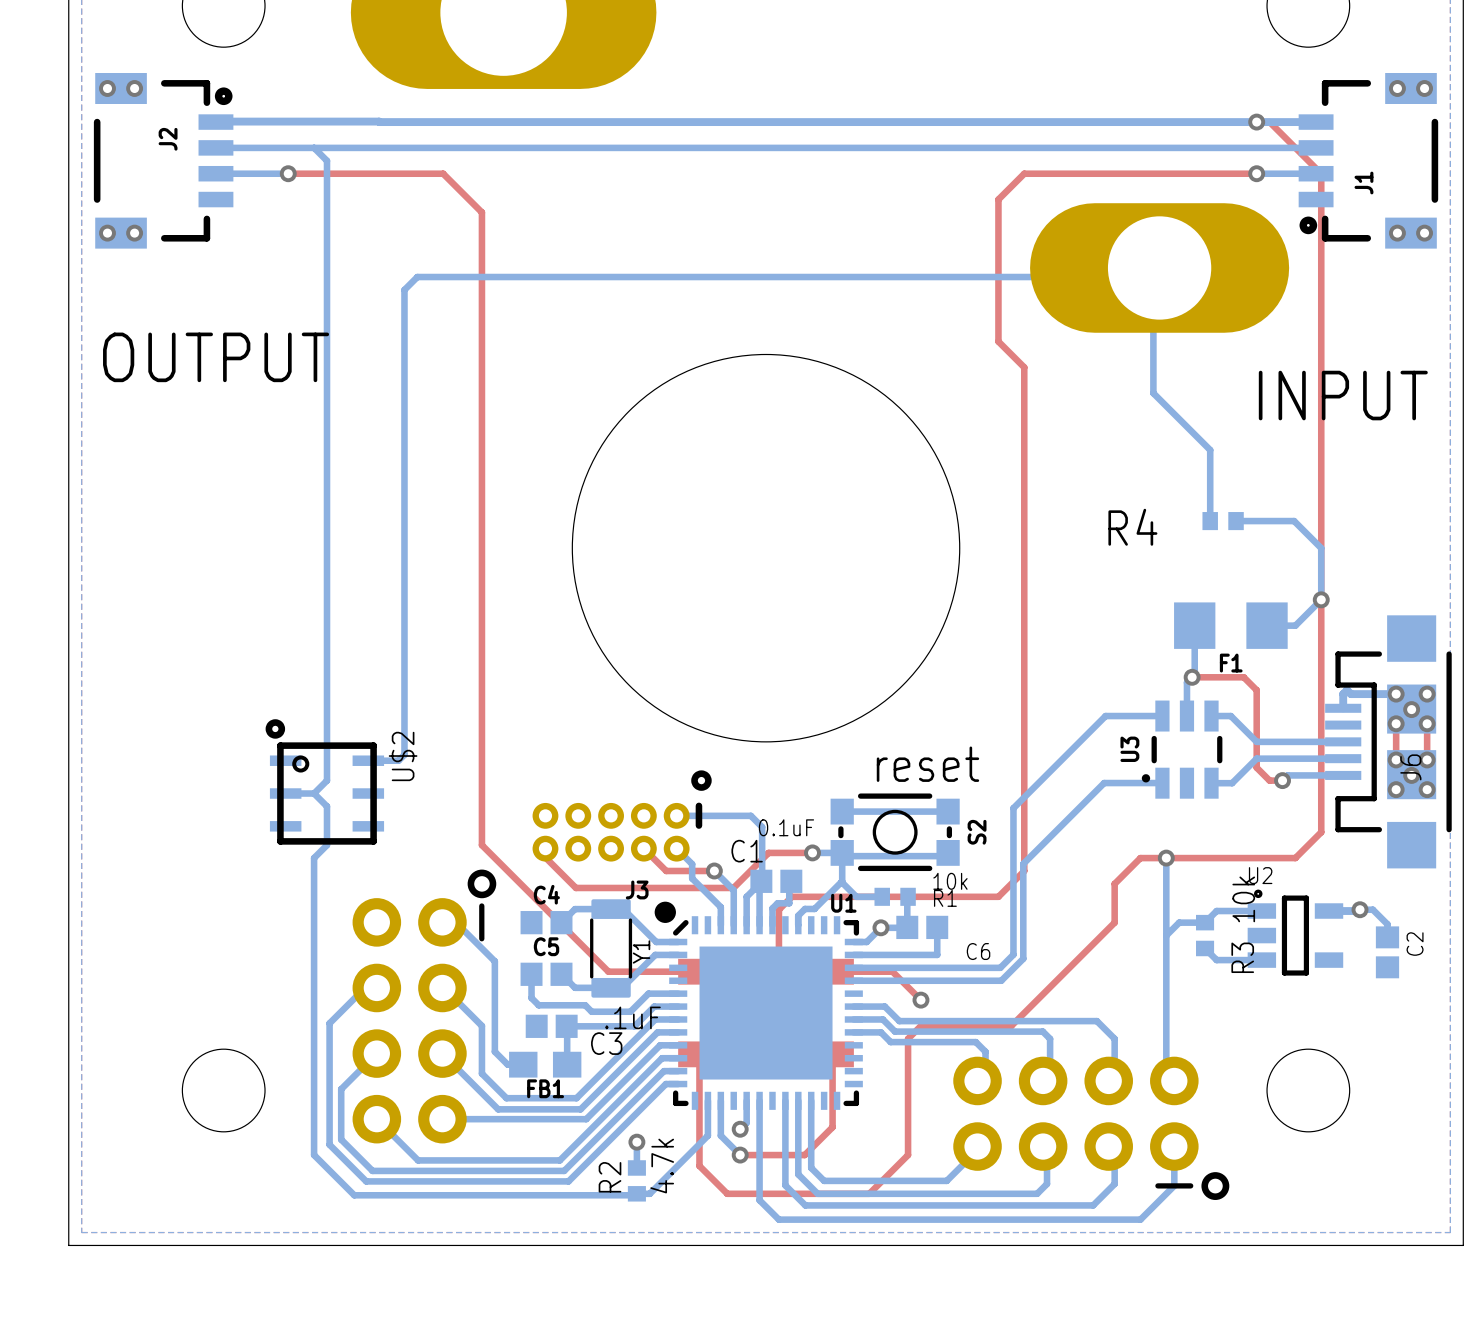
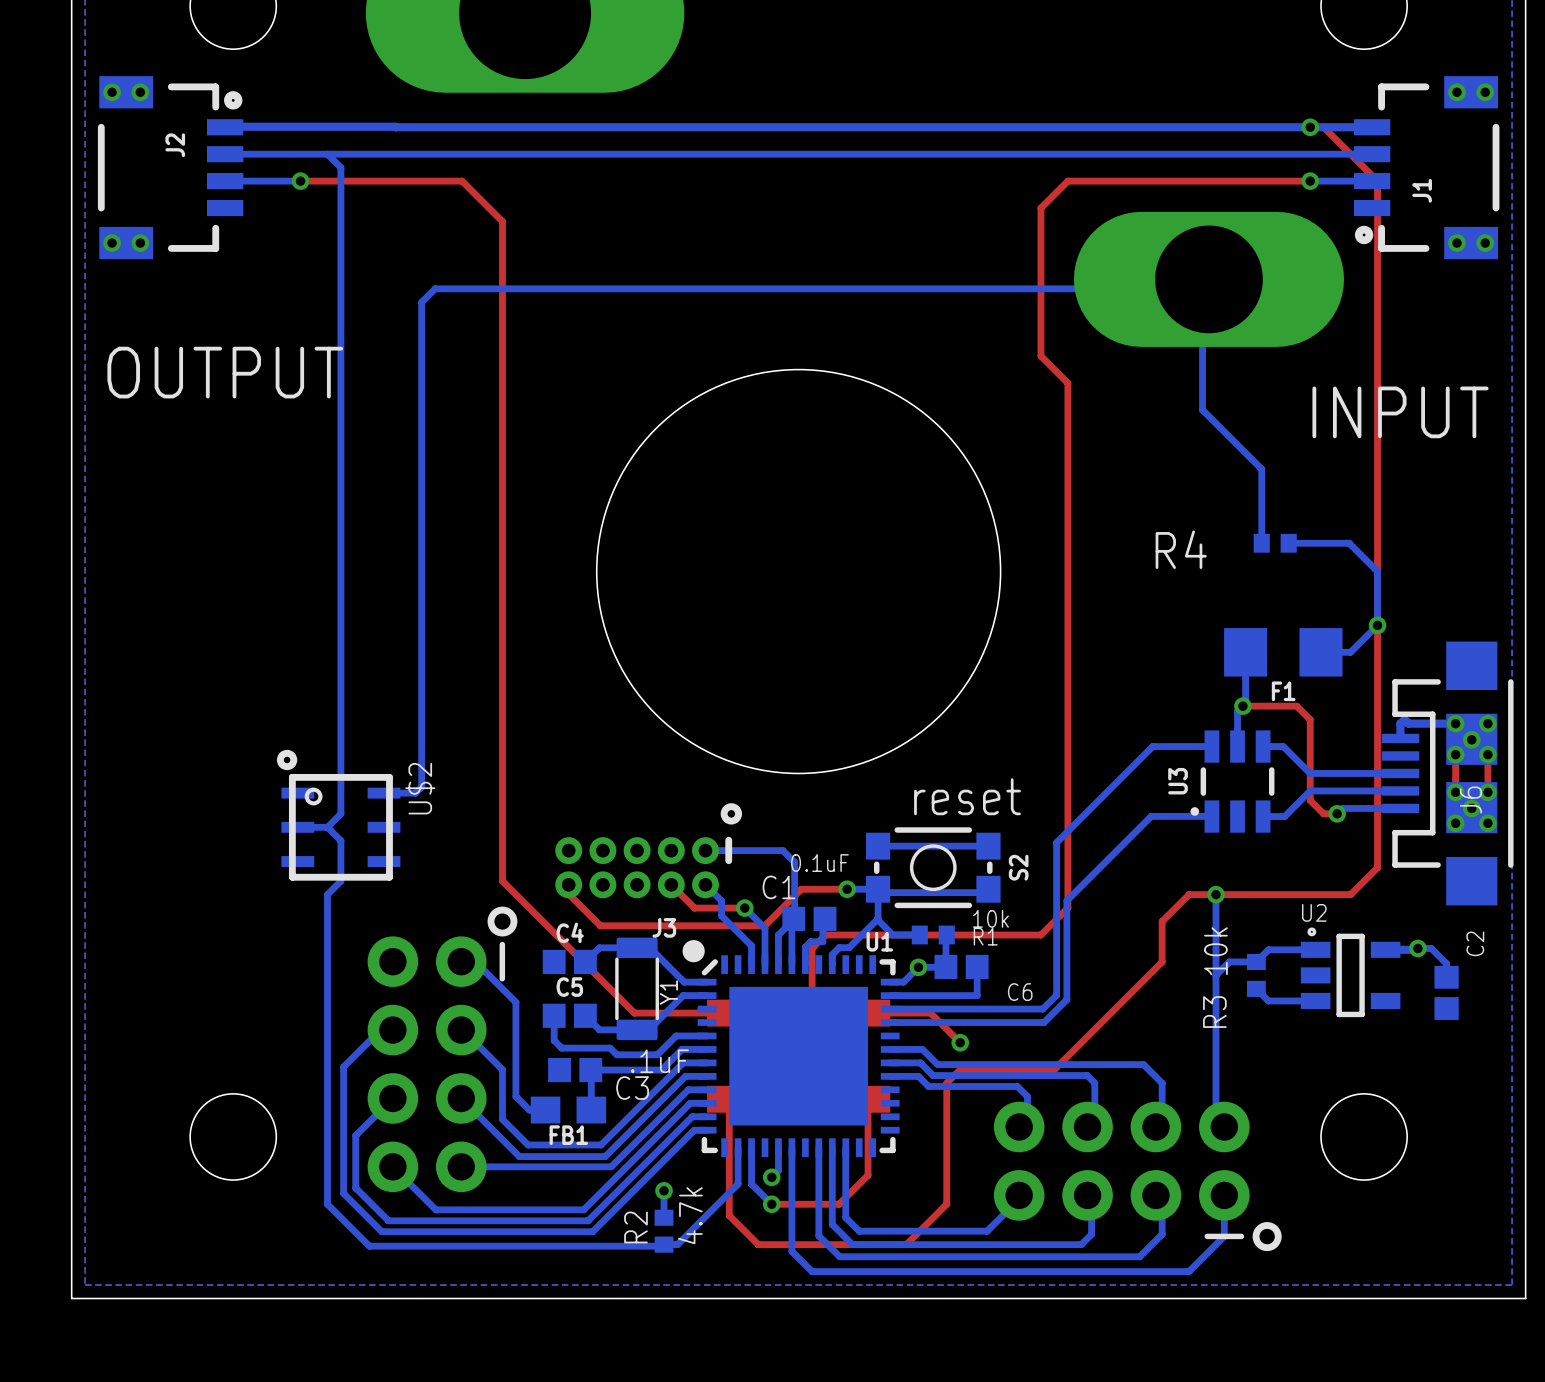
R3 value position: 10k (1243, 899) -> 10k (1215, 951)
C2 name position: C2 (1415, 944) -> C2 (1475, 943)
R3 name position: R3 (1242, 957) -> R3 (1214, 1012)

